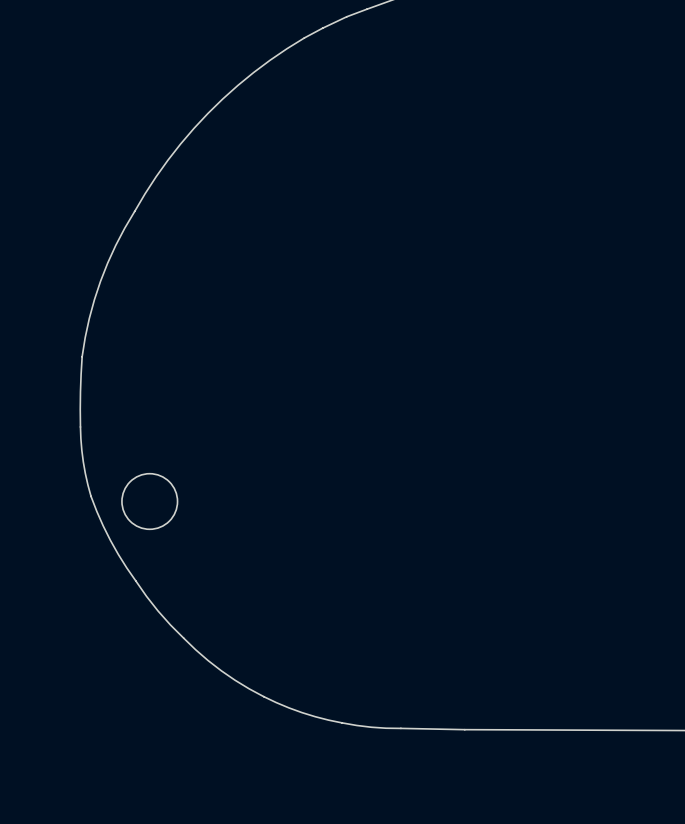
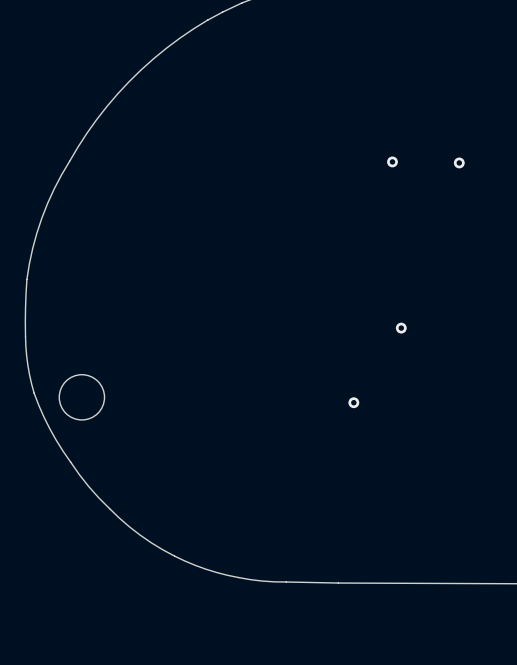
via: none -> (392, 161)
via: none -> (459, 162)
via: none -> (401, 328)
via: none -> (353, 402)

